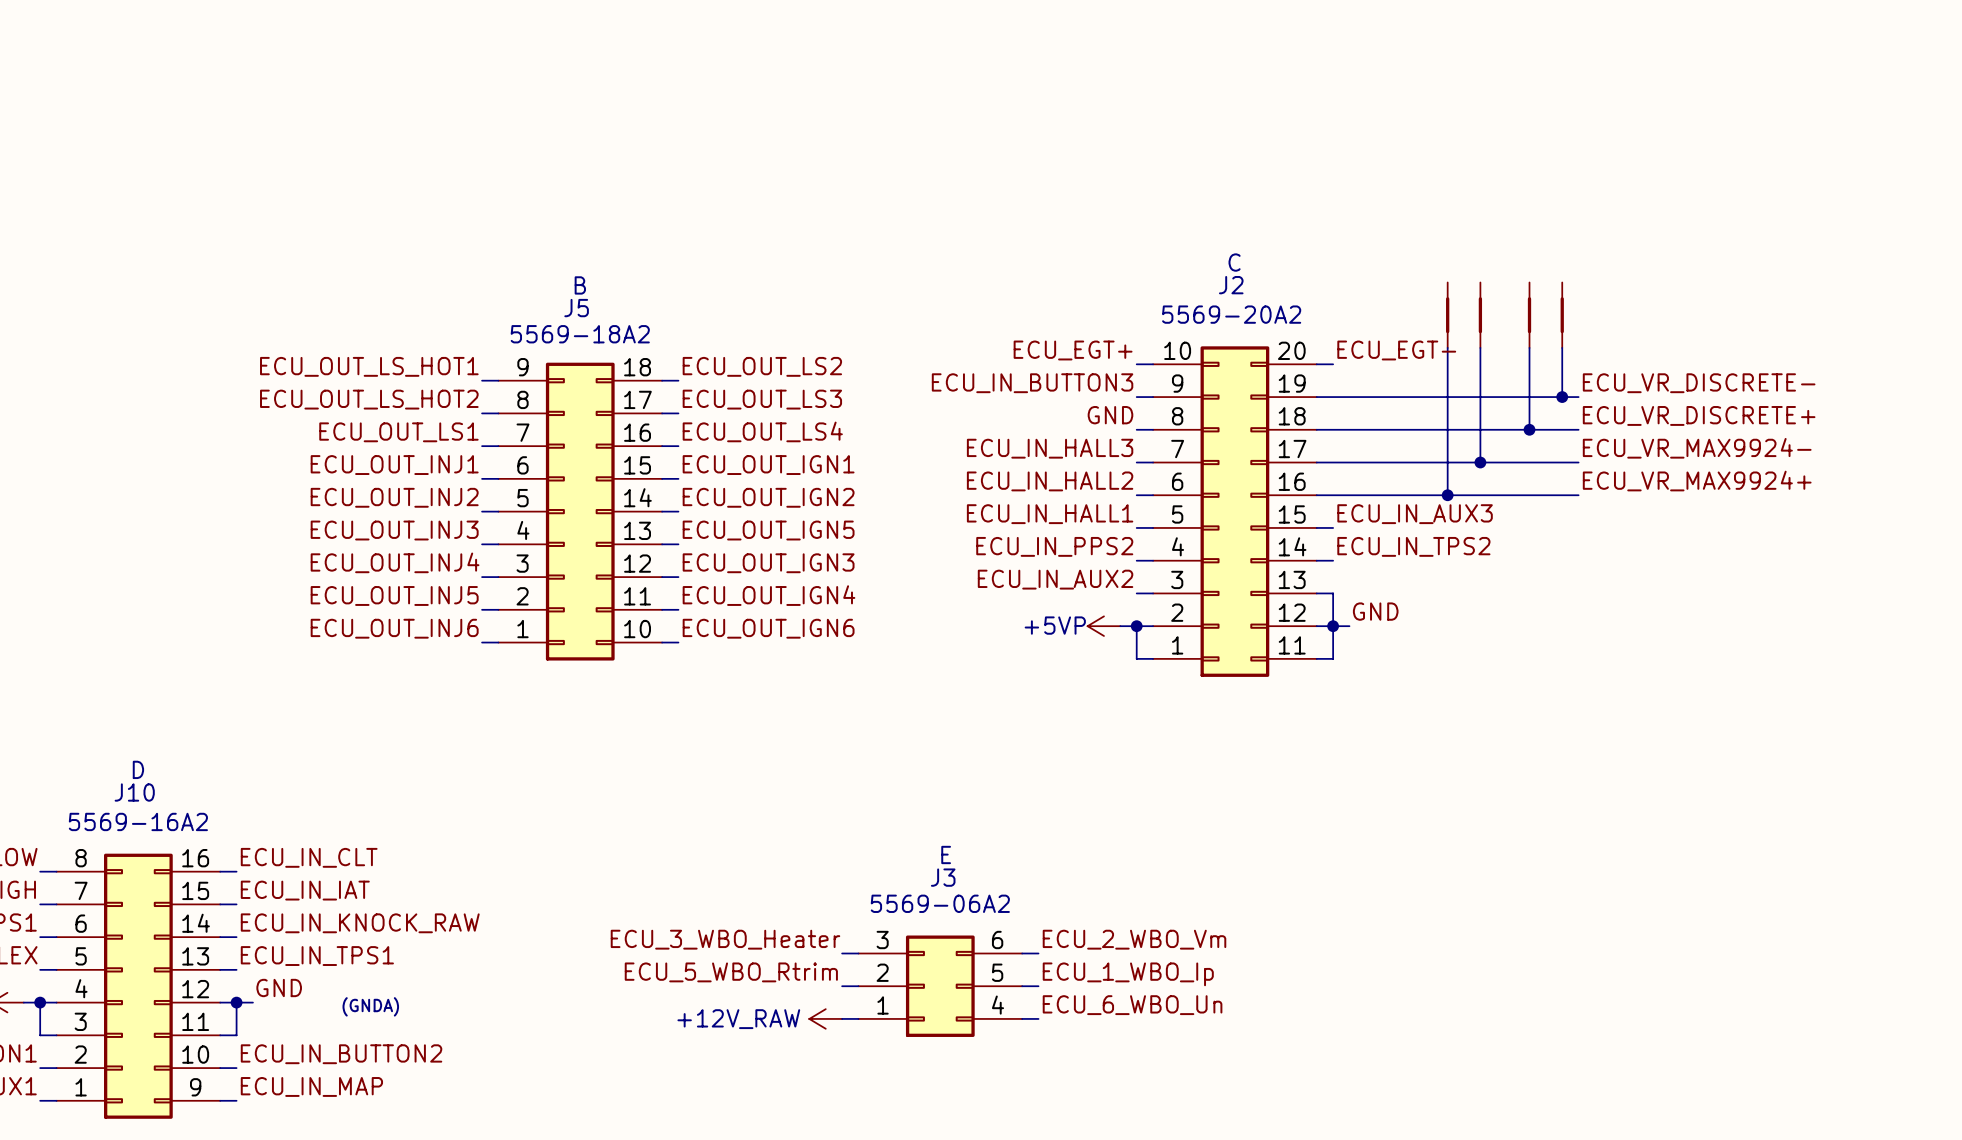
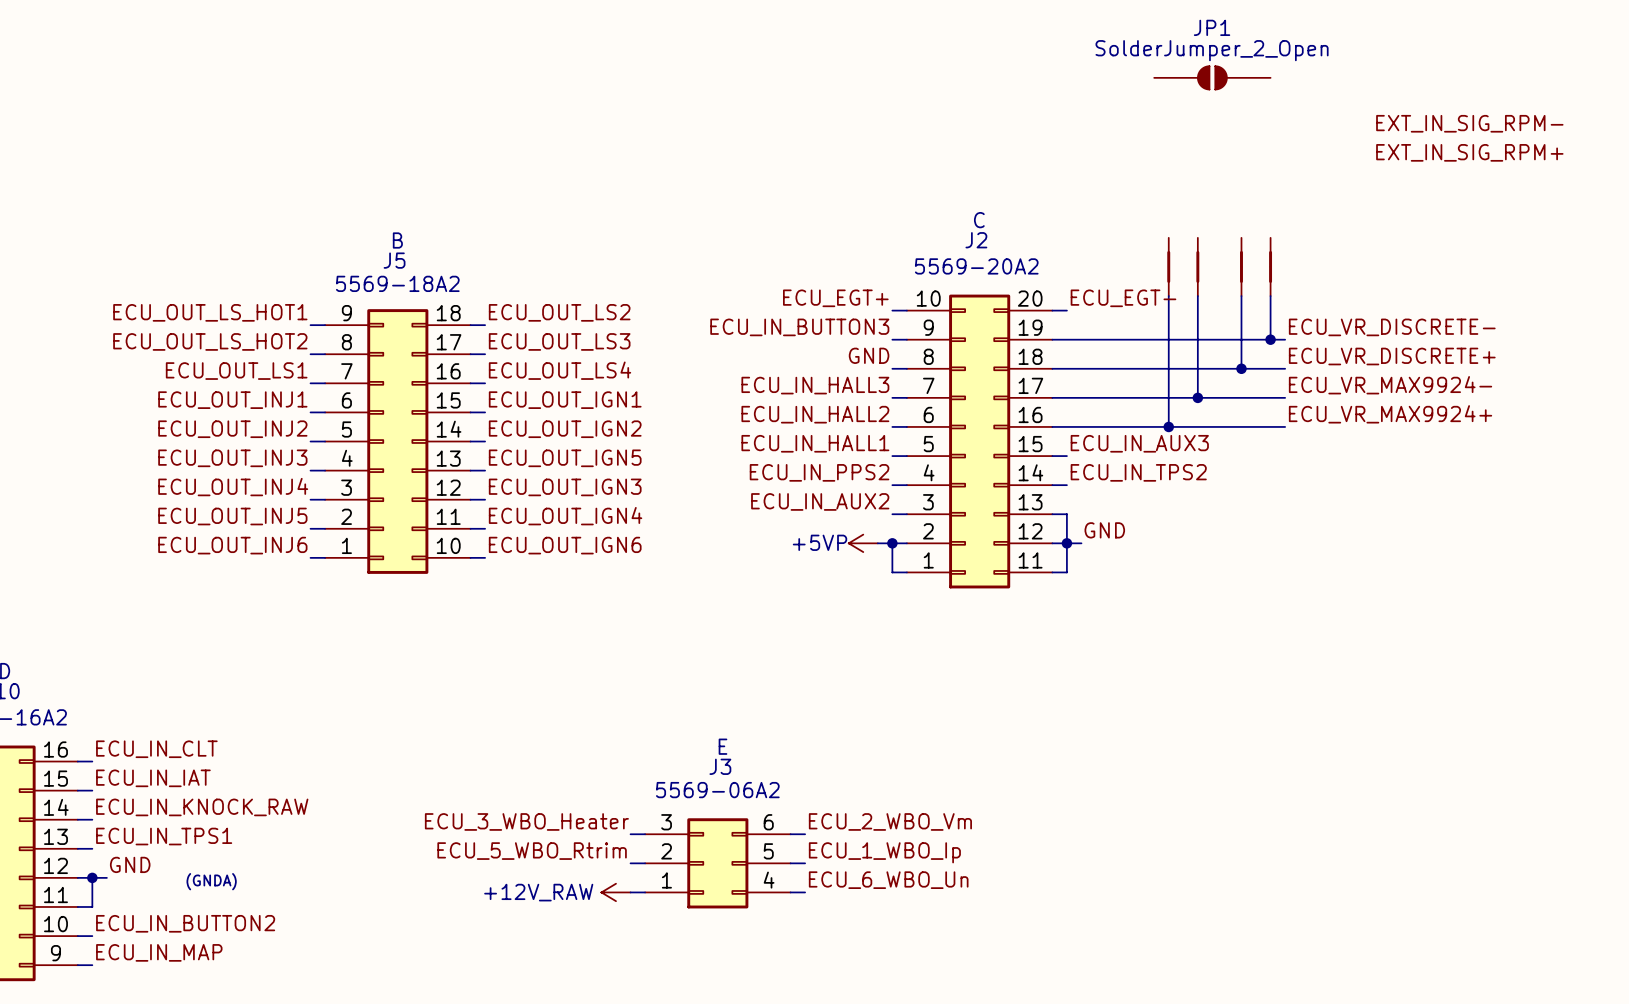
JP1: none -> SolderJumper_2_Open (1212, 77)
label: none -> EXT_IN_SIG_RPM- (1469, 123)
label: none -> EXT_IN_SIG_RPM+ (1469, 152)

